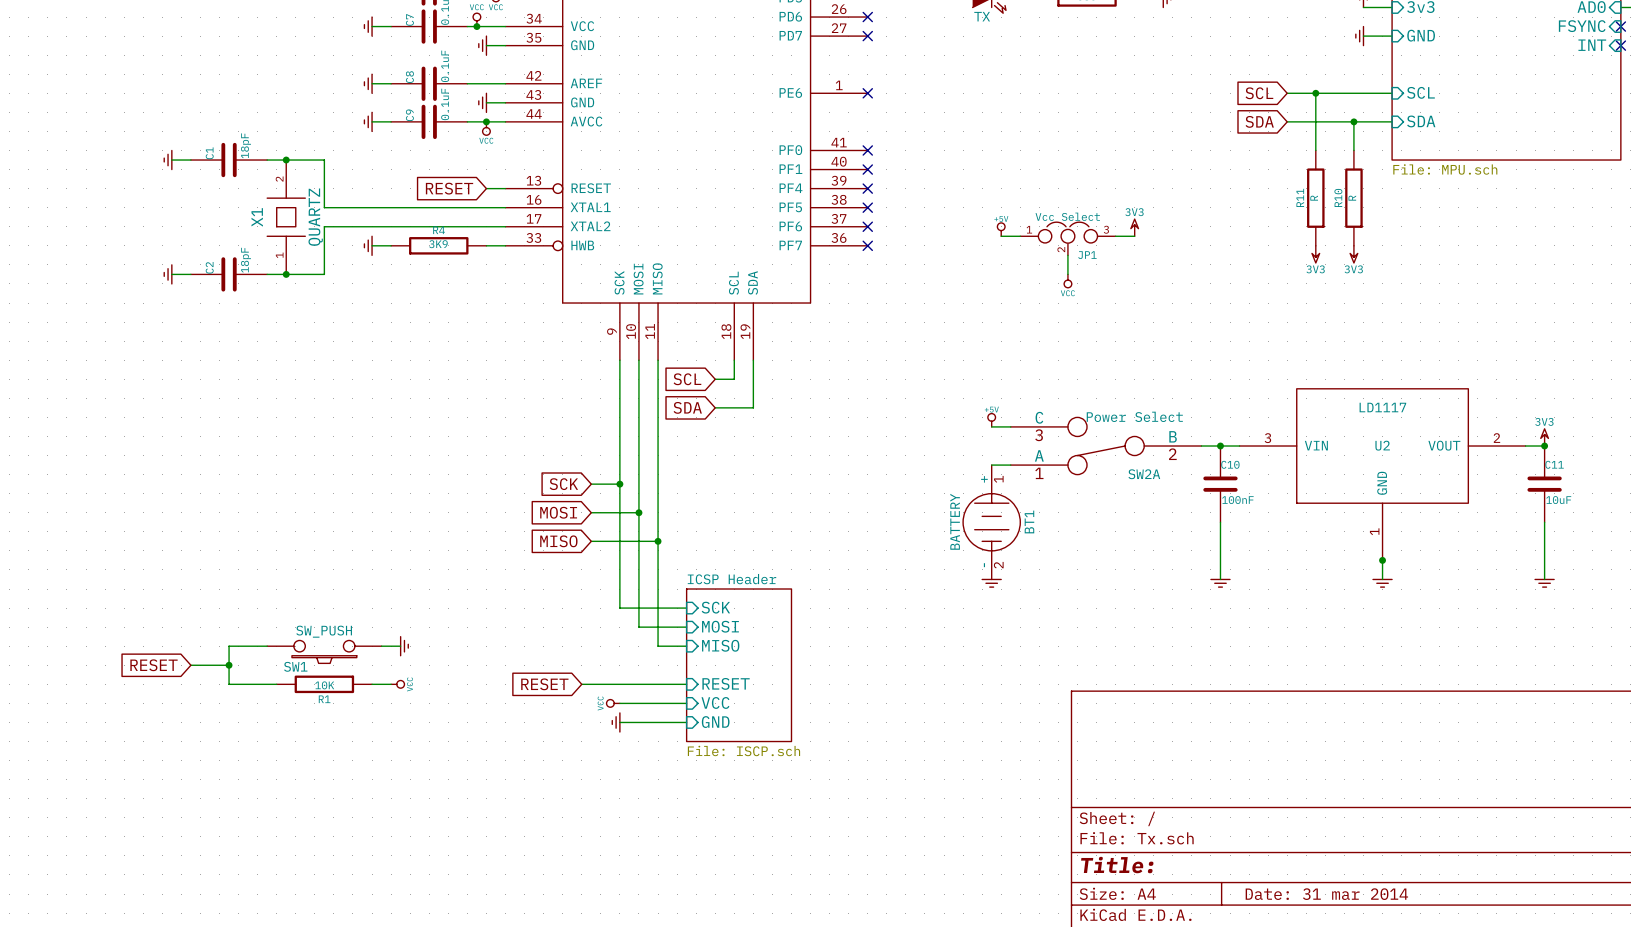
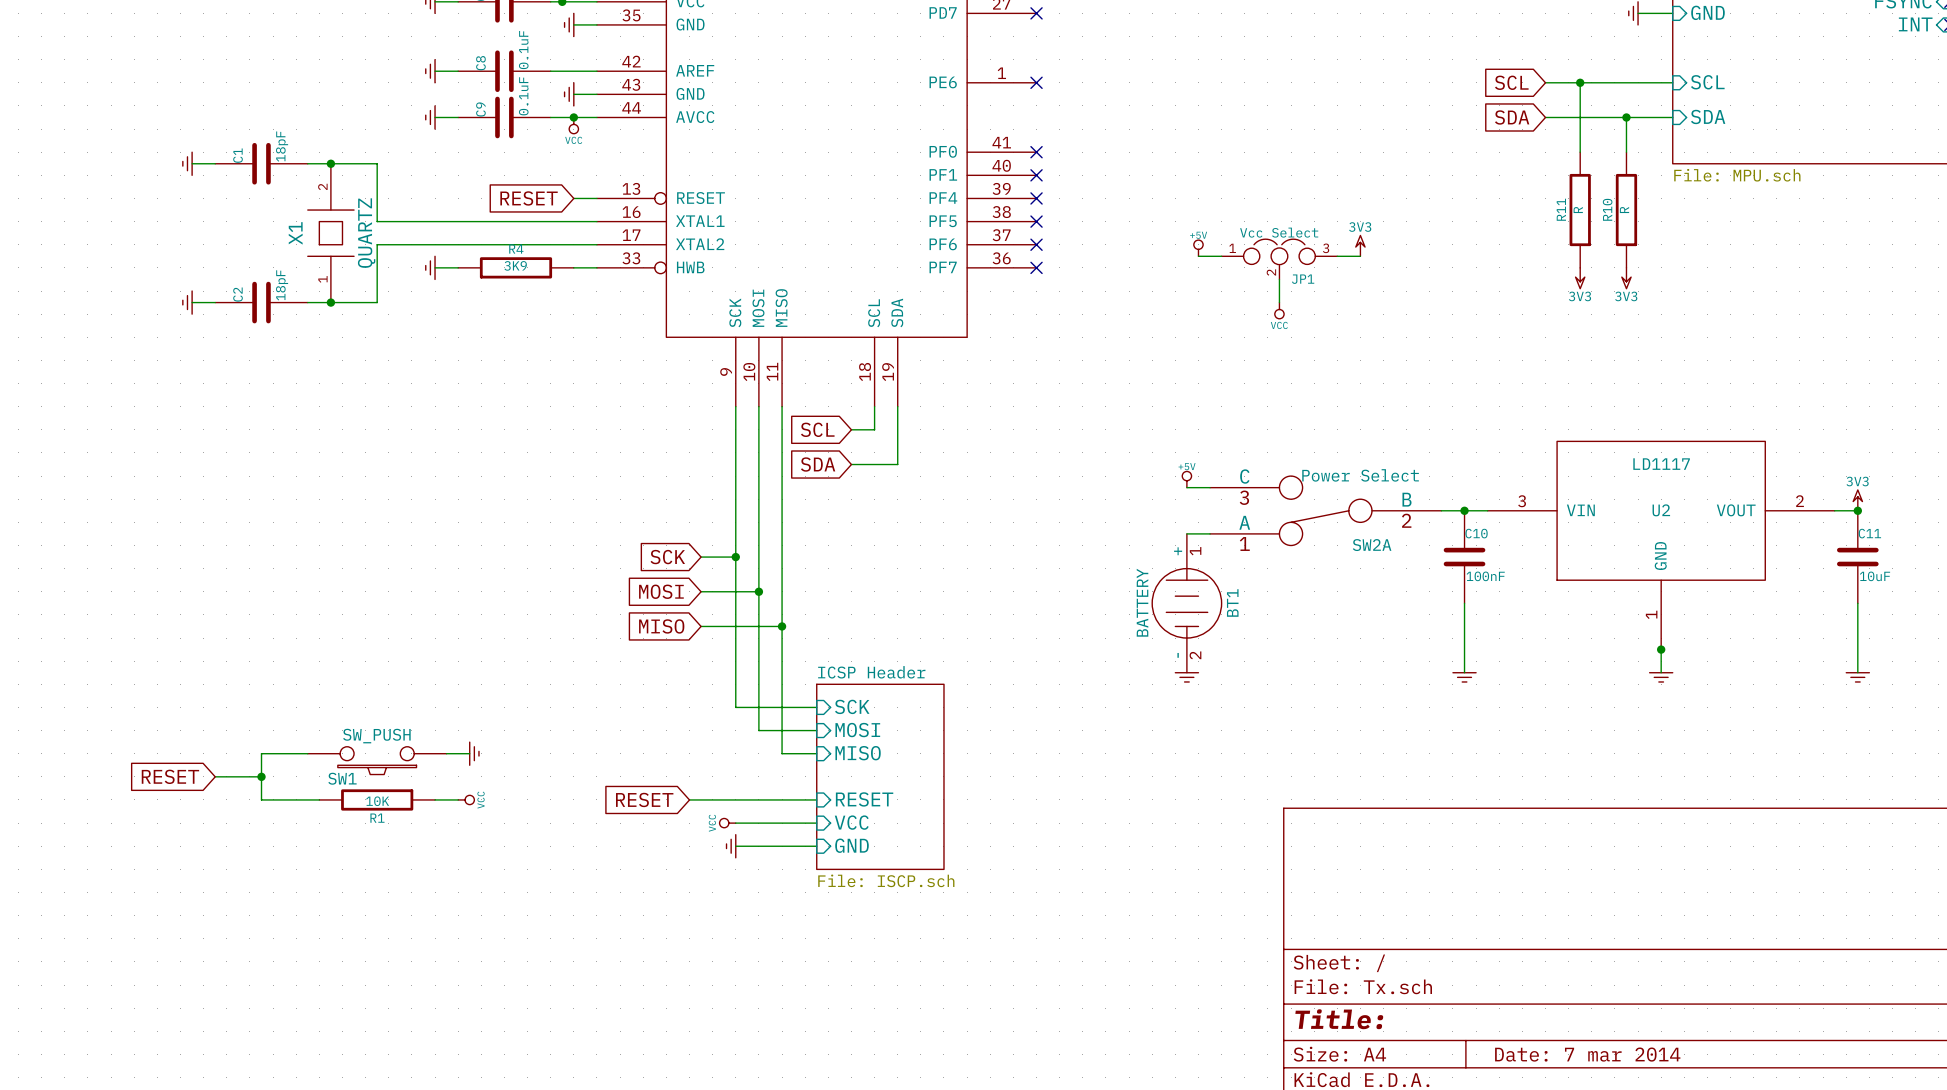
title block: Date: 31 mar 2014 (1326, 894) -> Date: 7 mar 2014 (1587, 1054)

